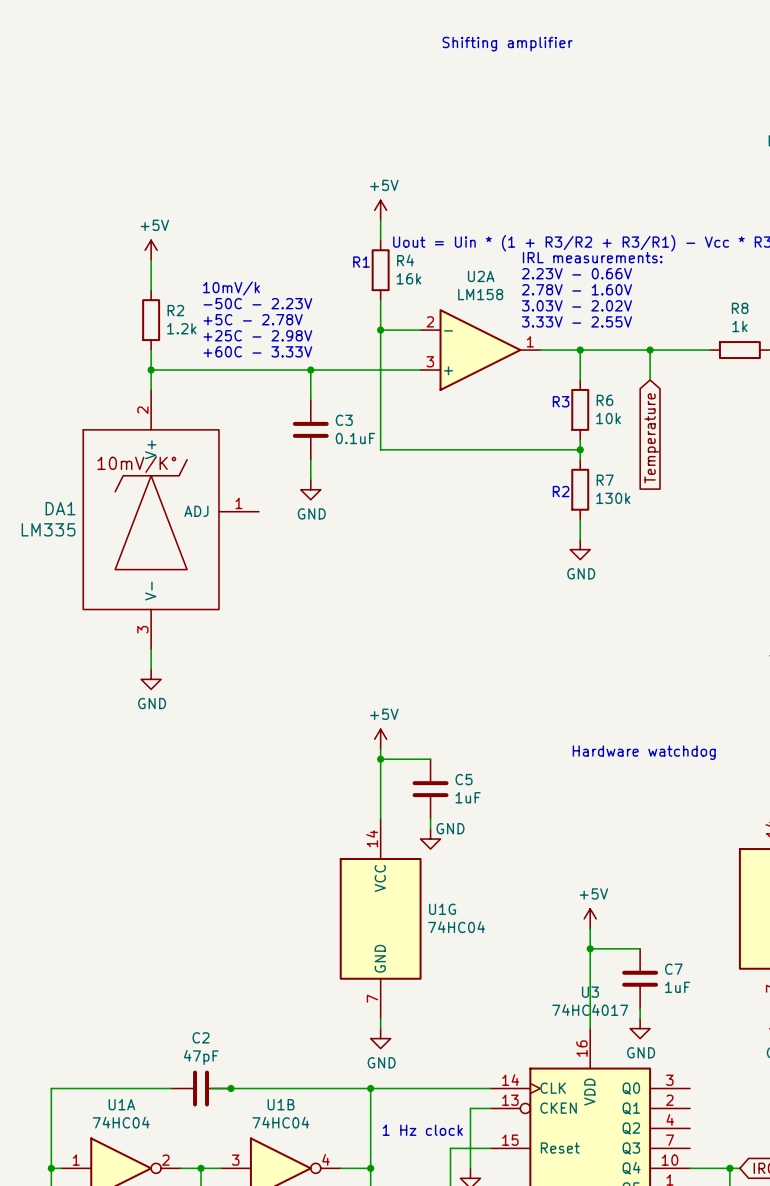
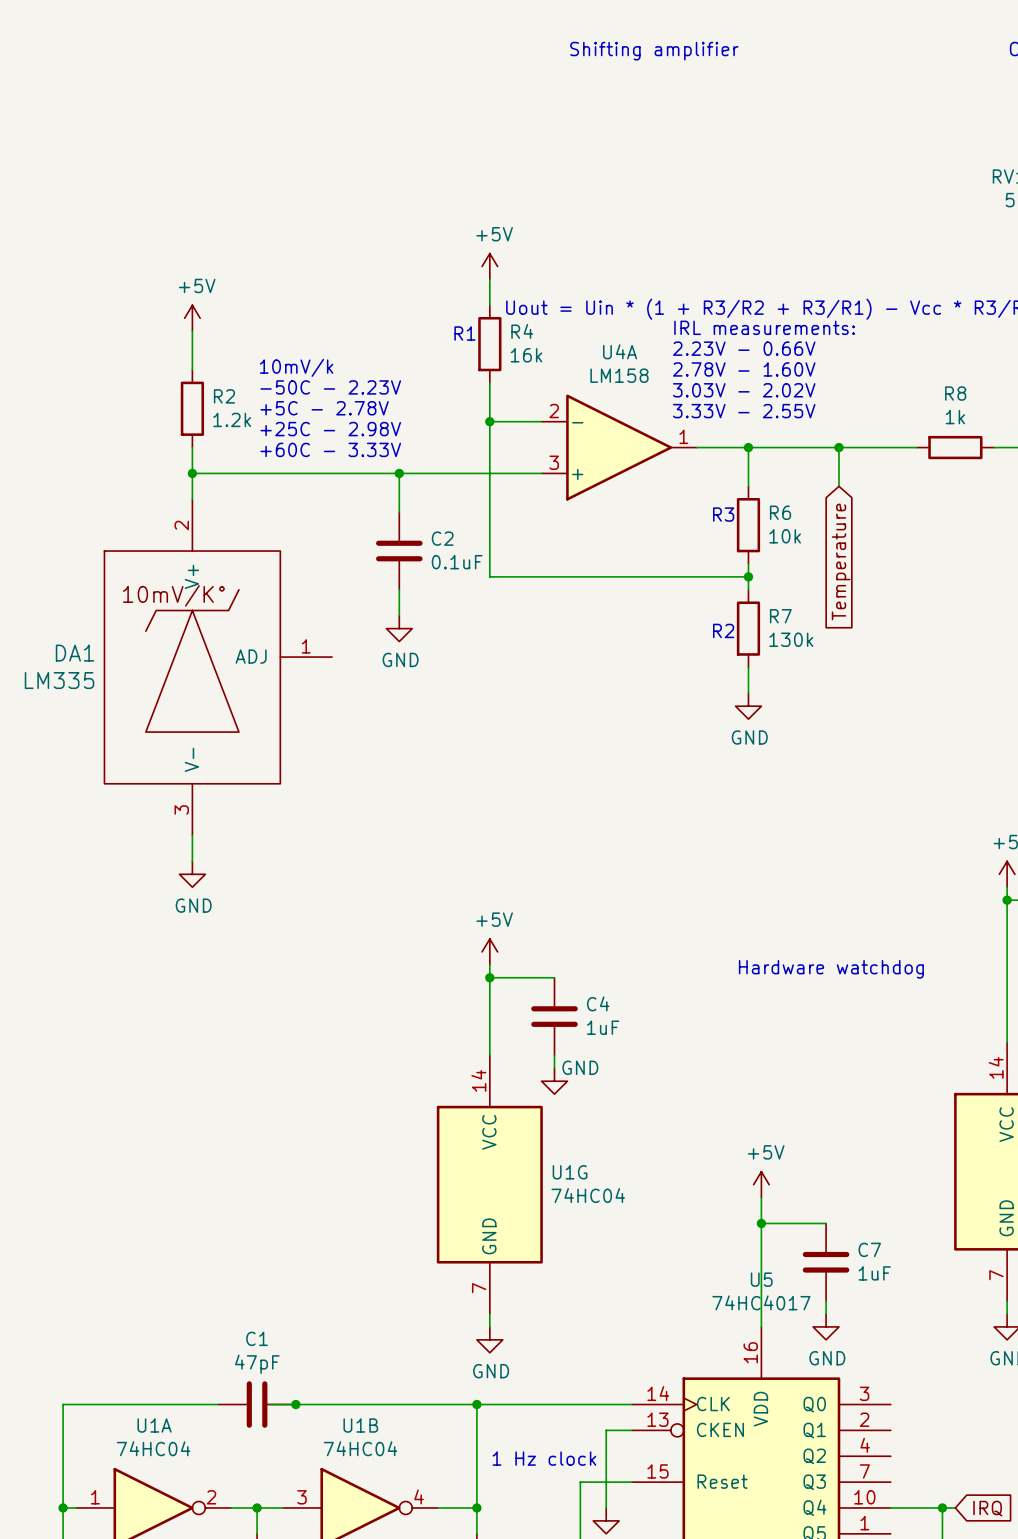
U2A name: U2A (481, 276) -> U4A (620, 351)
C3 name: C3 (344, 420) -> C2 (442, 538)
C5 name: C5 (464, 779) -> C4 (598, 1003)
U3 name: U3 (590, 992) -> U5 (761, 1279)
C2 name: C2 (201, 1037) -> C1 (257, 1338)

